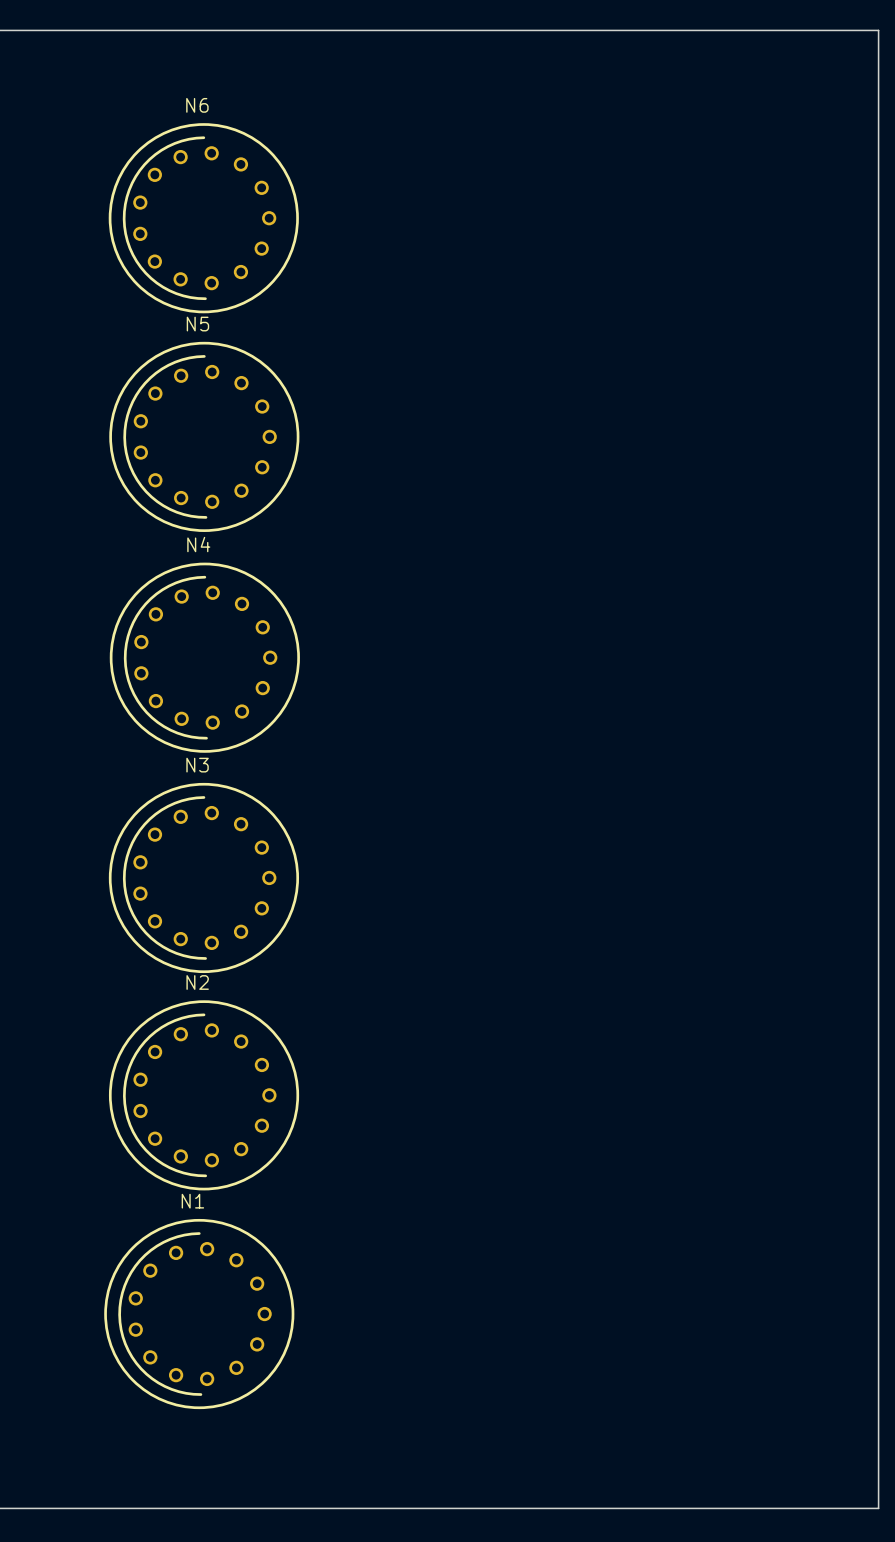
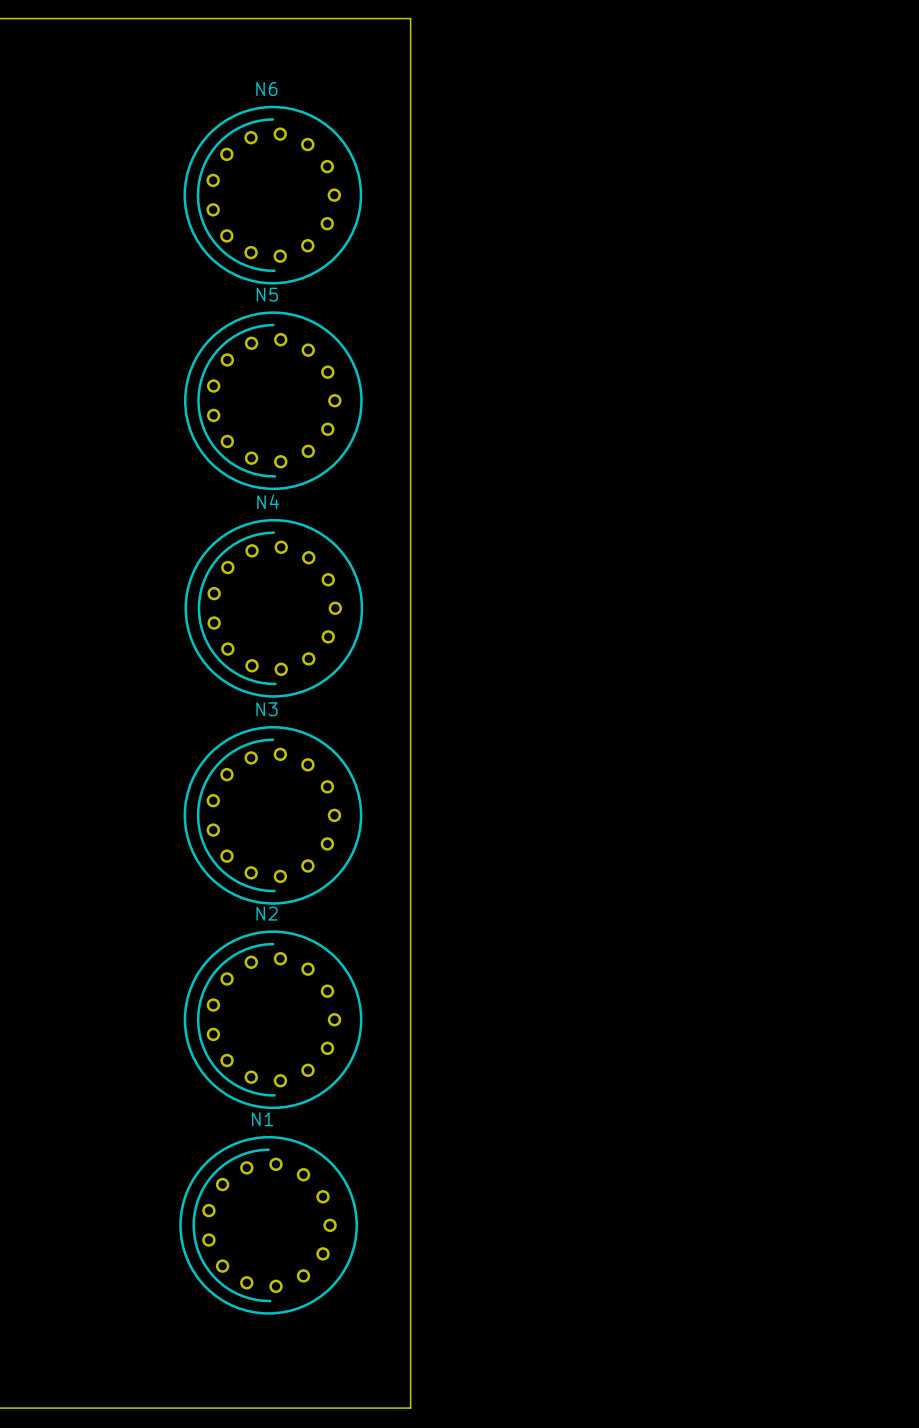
board edge: (350, 30) (878, 30) (878, 1508) (350, 1508) -> (410, 18) (410, 1408)

